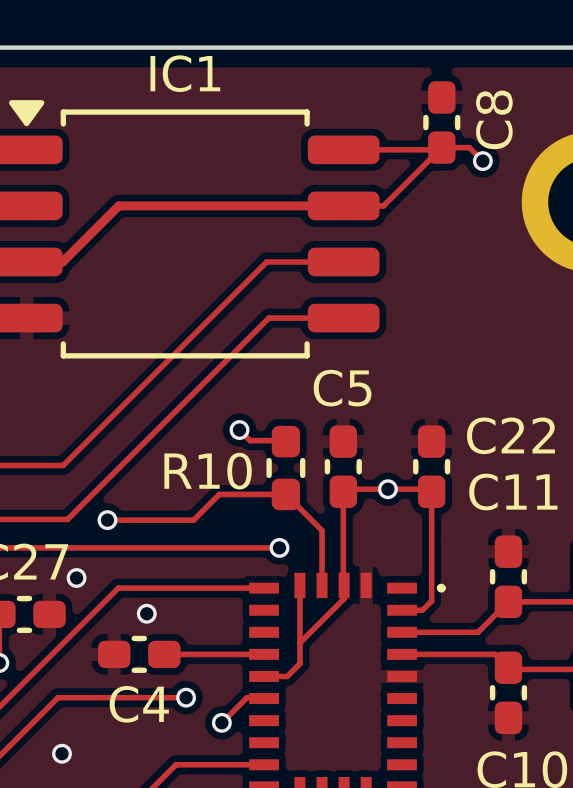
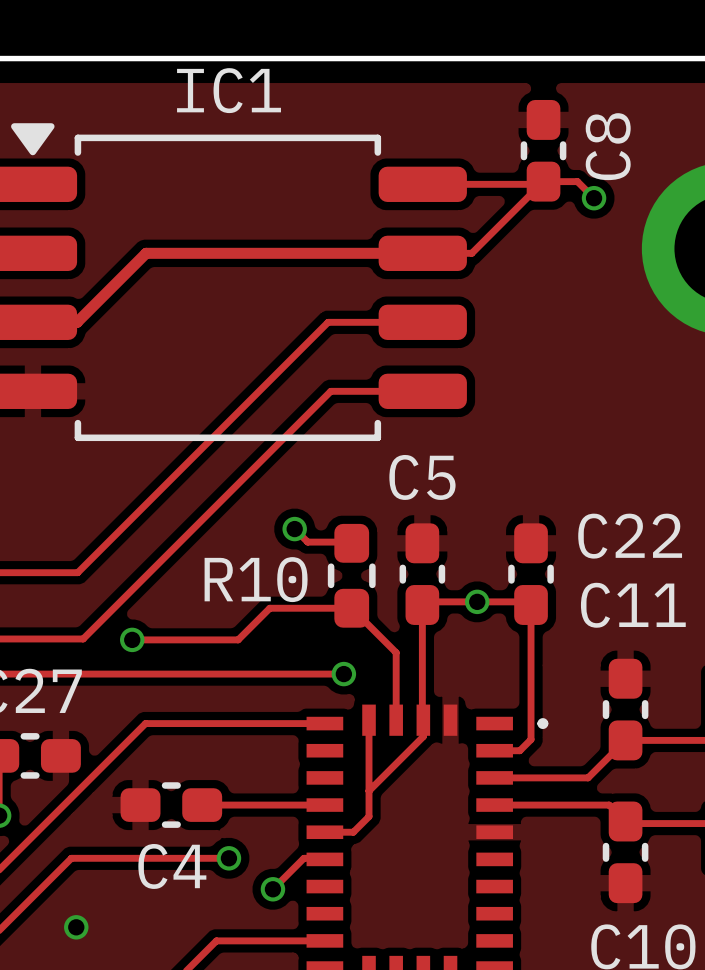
via: (76, 577) -> none
via: (146, 613) -> none

